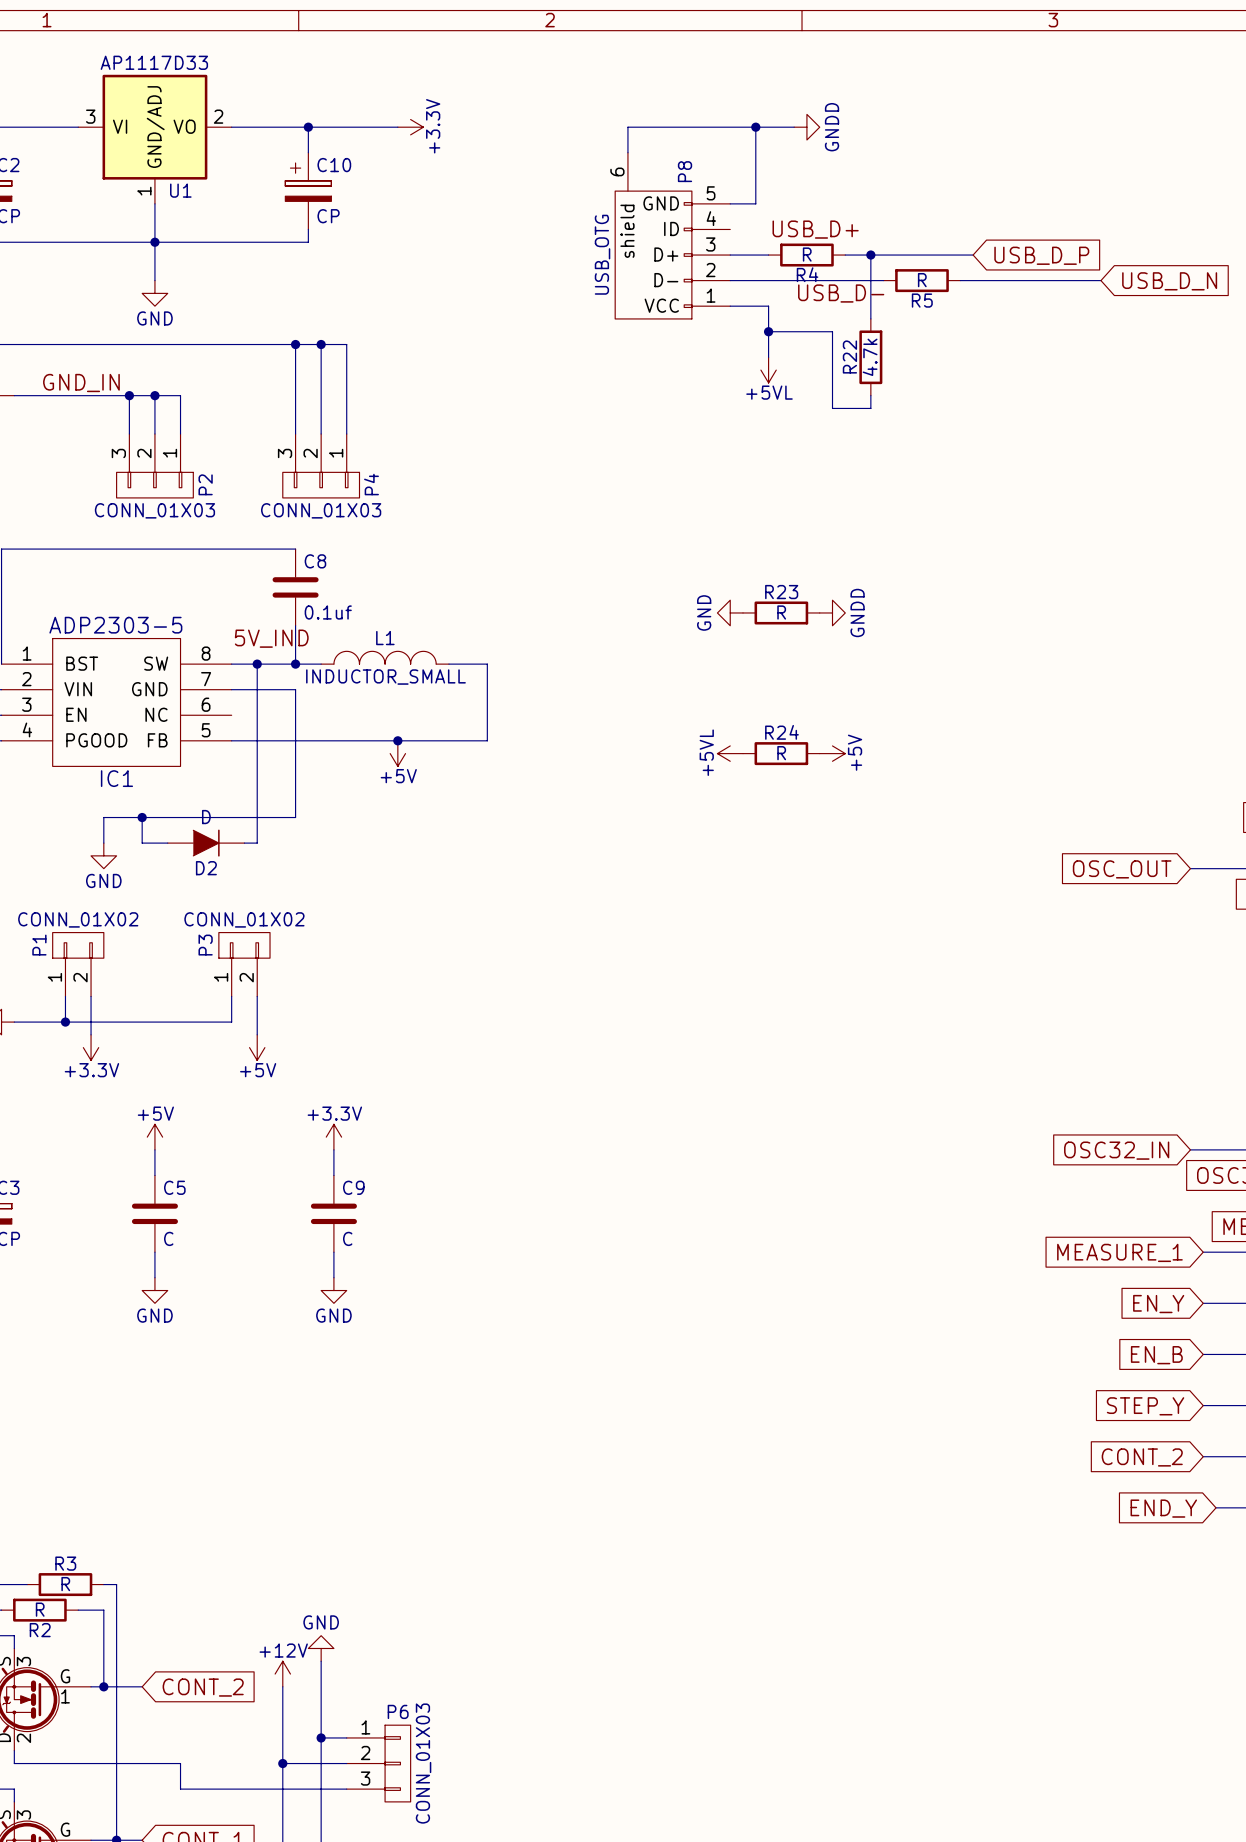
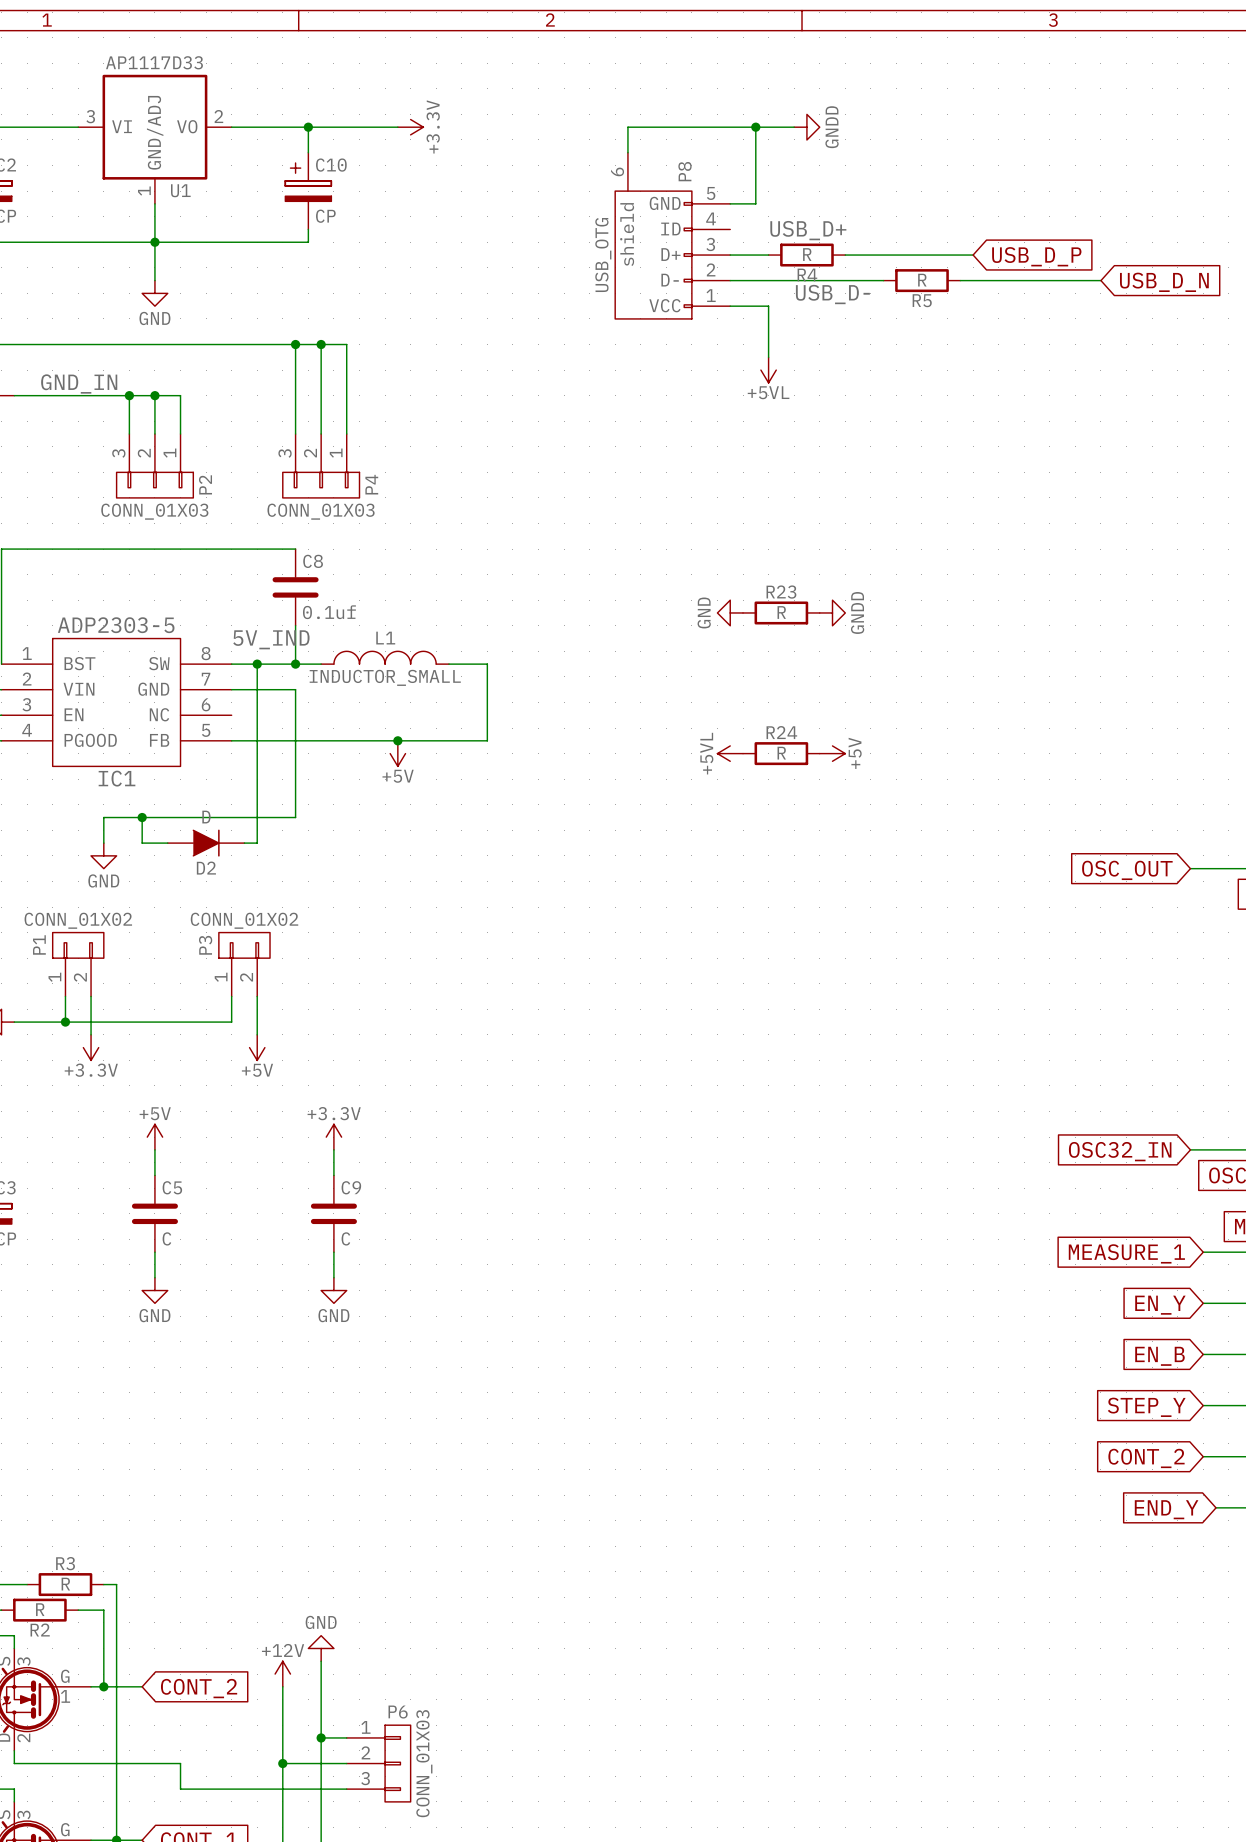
wire: (870, 255) (870, 318) -> none
junction: (870, 255) -> none
wire: (768, 331) (832, 331) (832, 408) (870, 408) (870, 395) -> none
junction: (768, 331) -> none
R22: 4.7k (870, 357) -> none

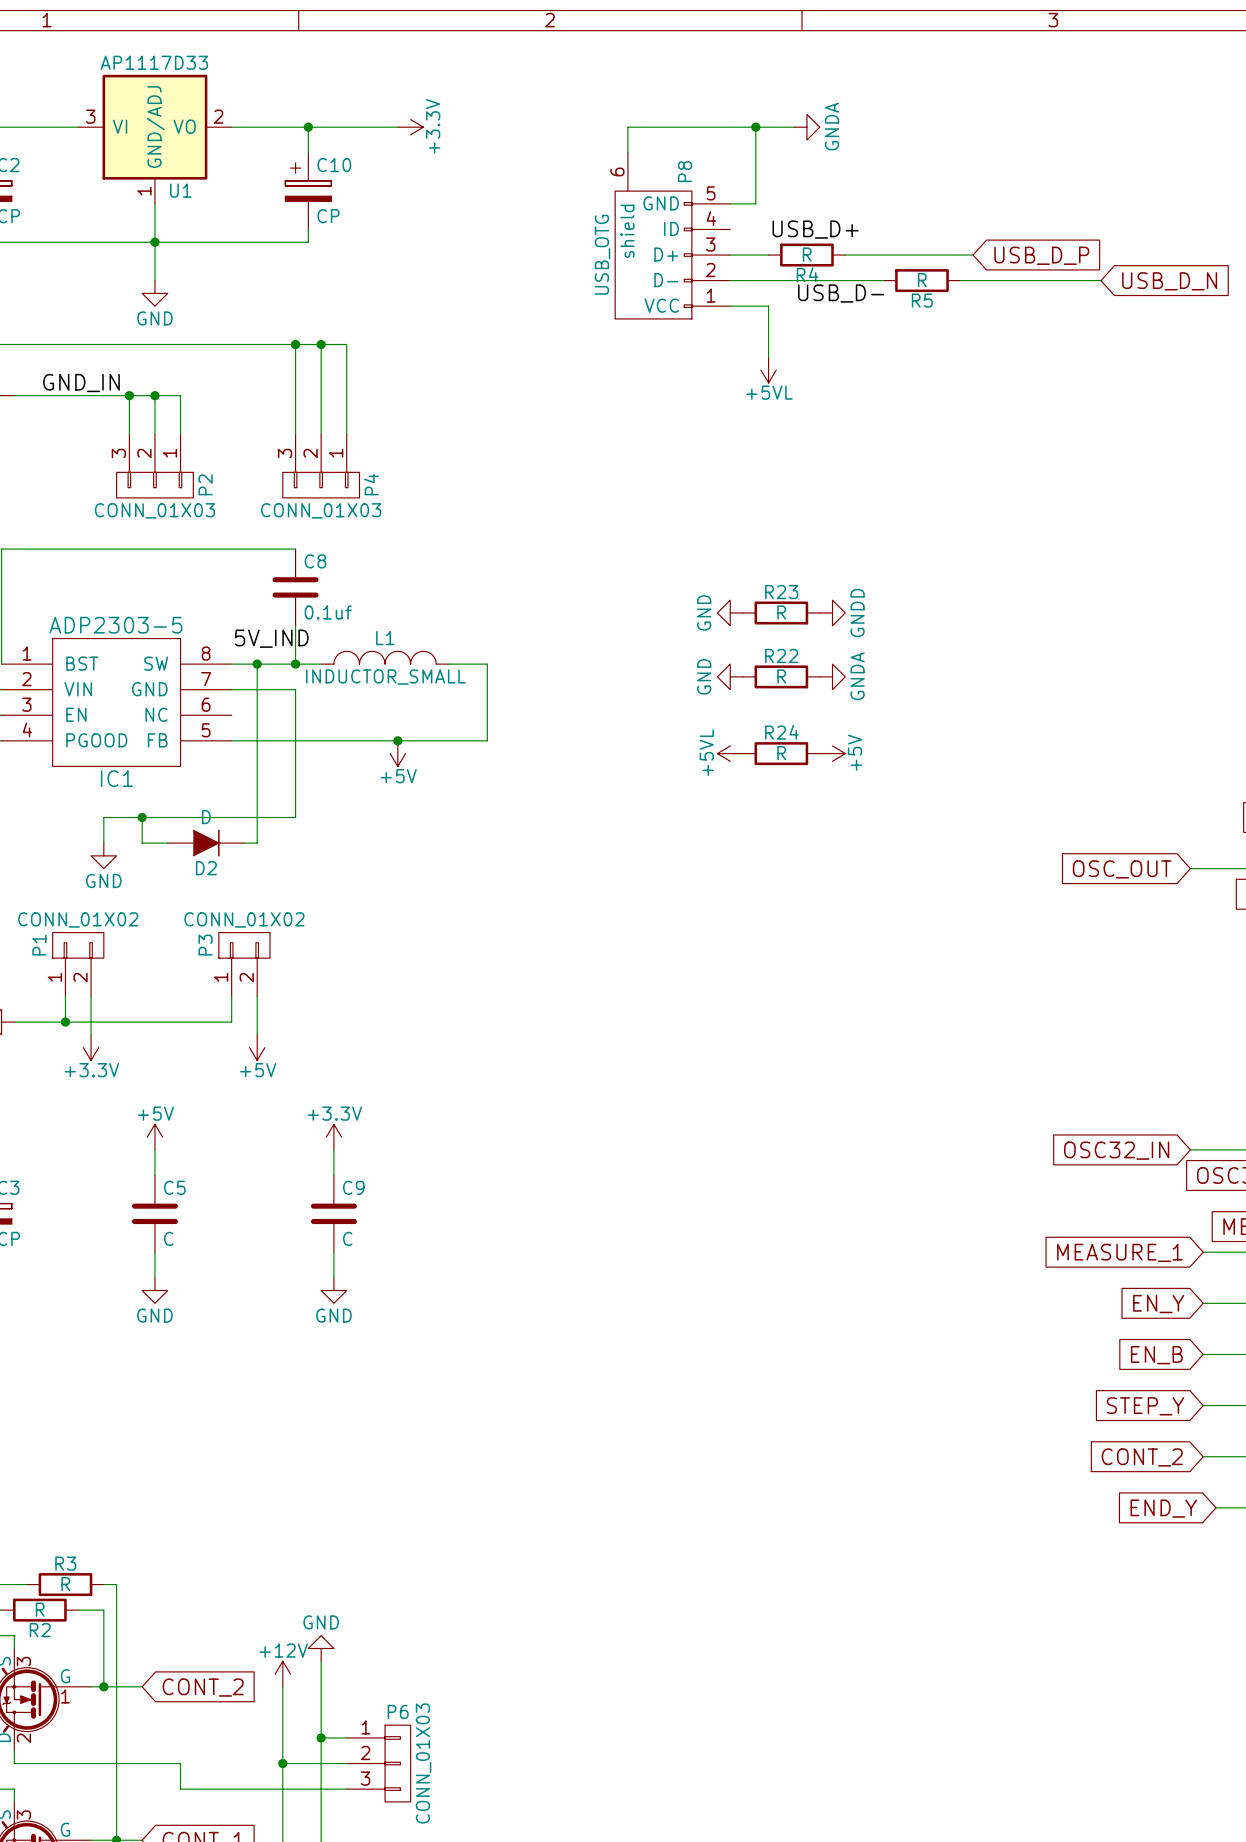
power symbol: GNDD (806, 127) -> GNDA (806, 127)
power symbol: none -> GND (730, 676)
R22: none -> R (781, 676)
power symbol: none -> GNDA (832, 676)

